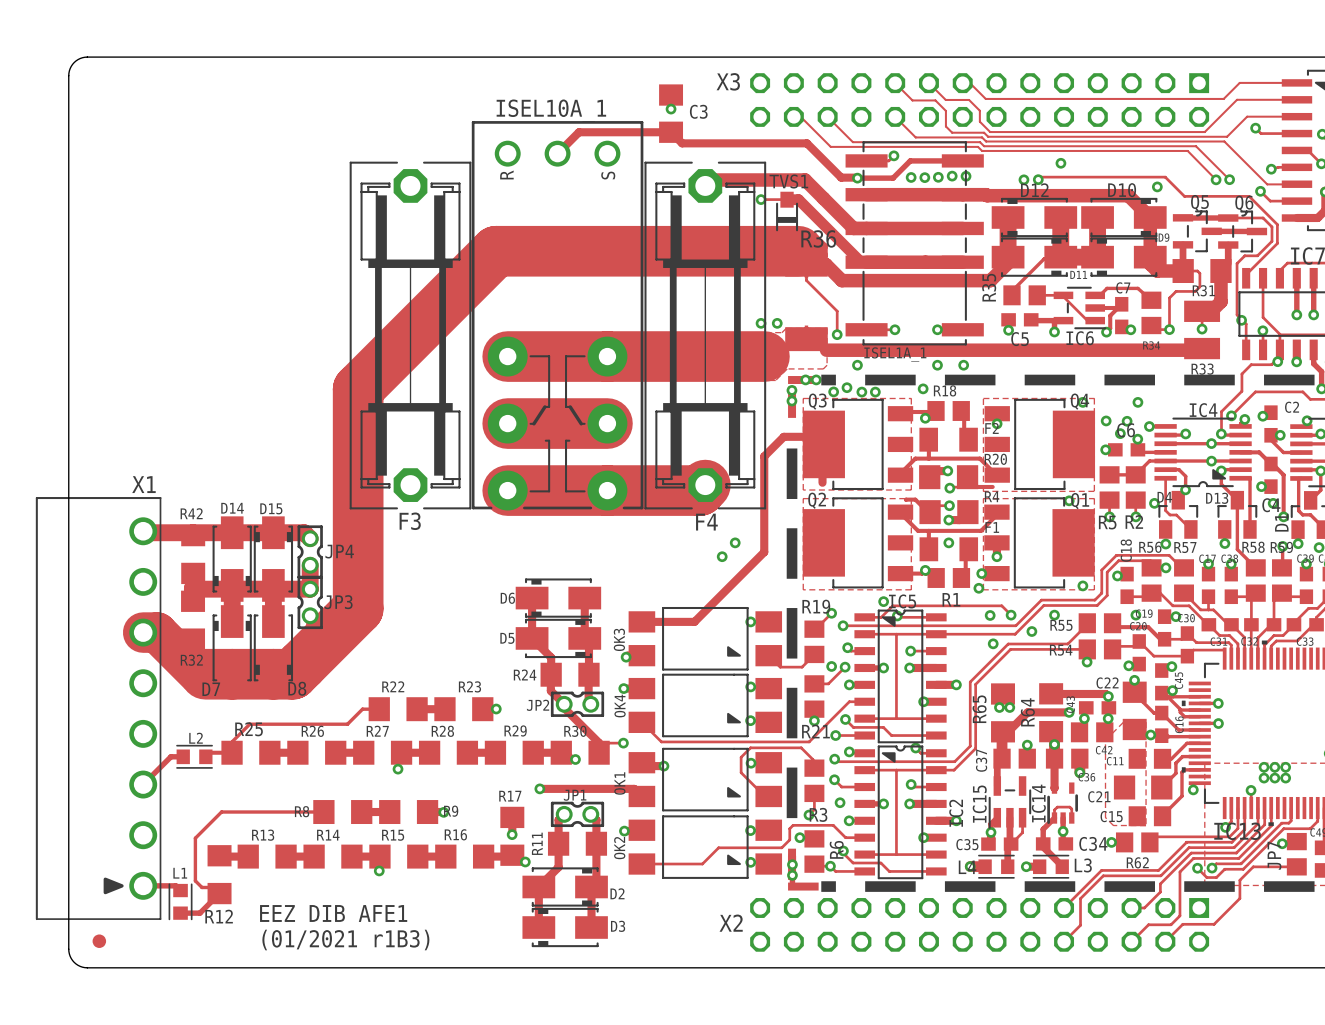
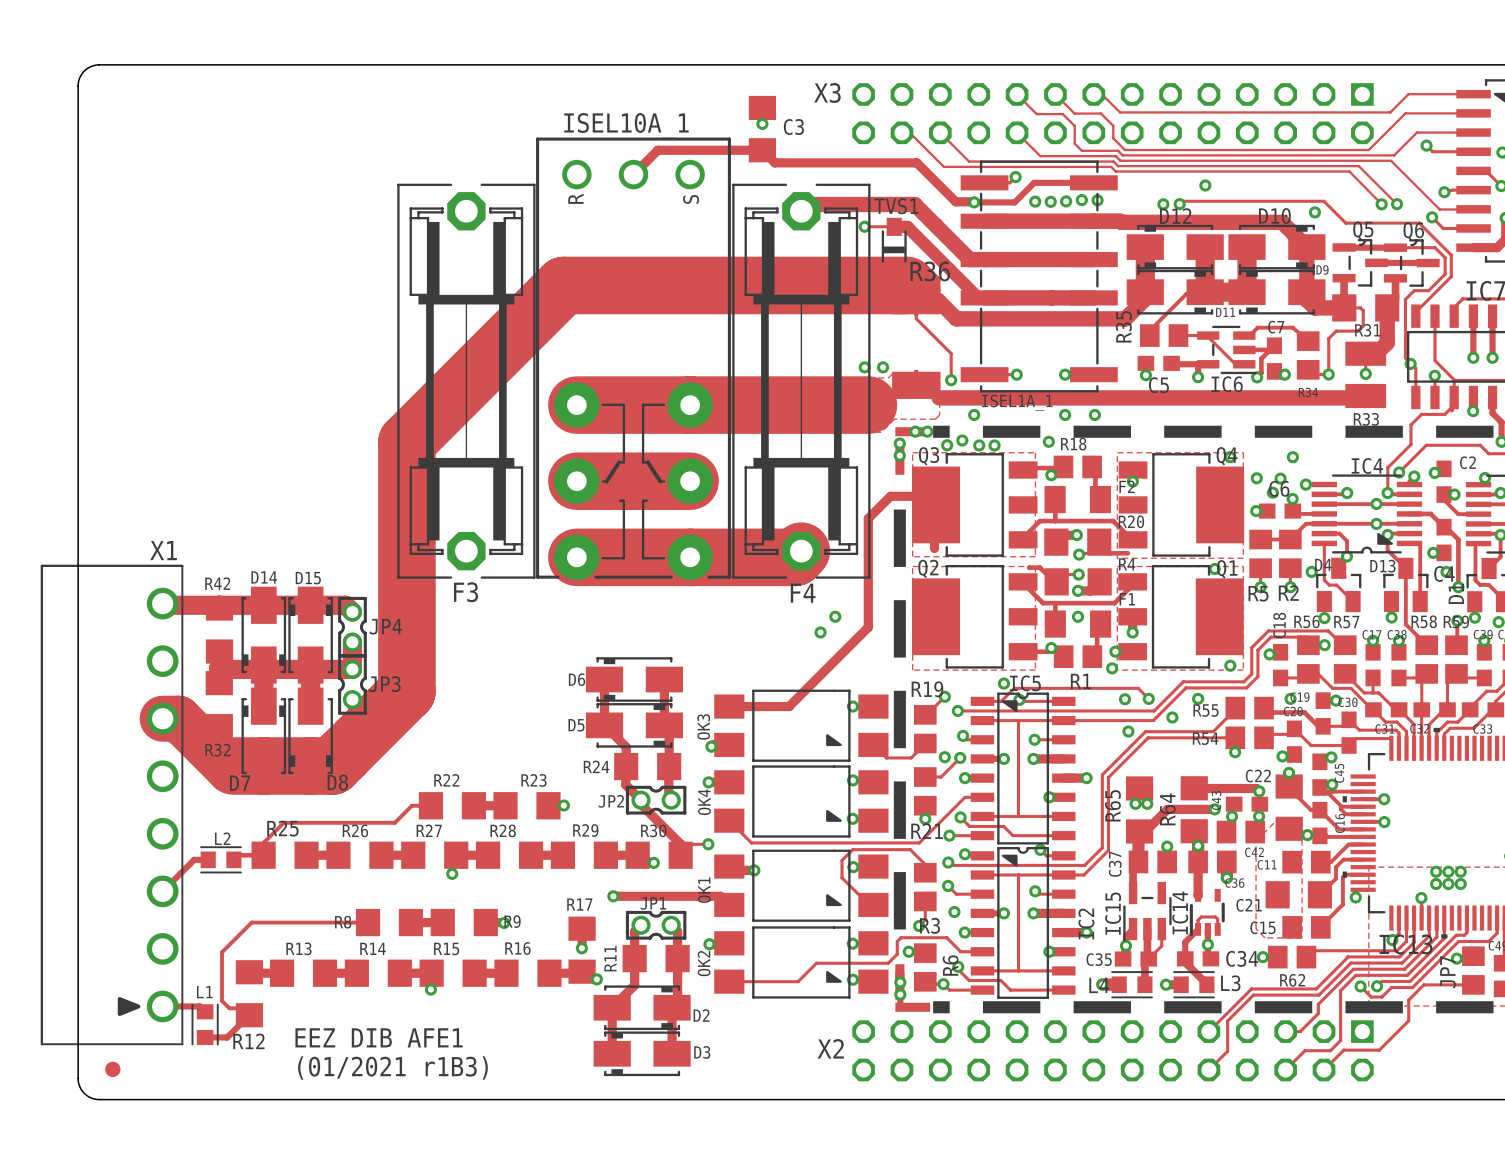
via: (1277, 361) -> none

